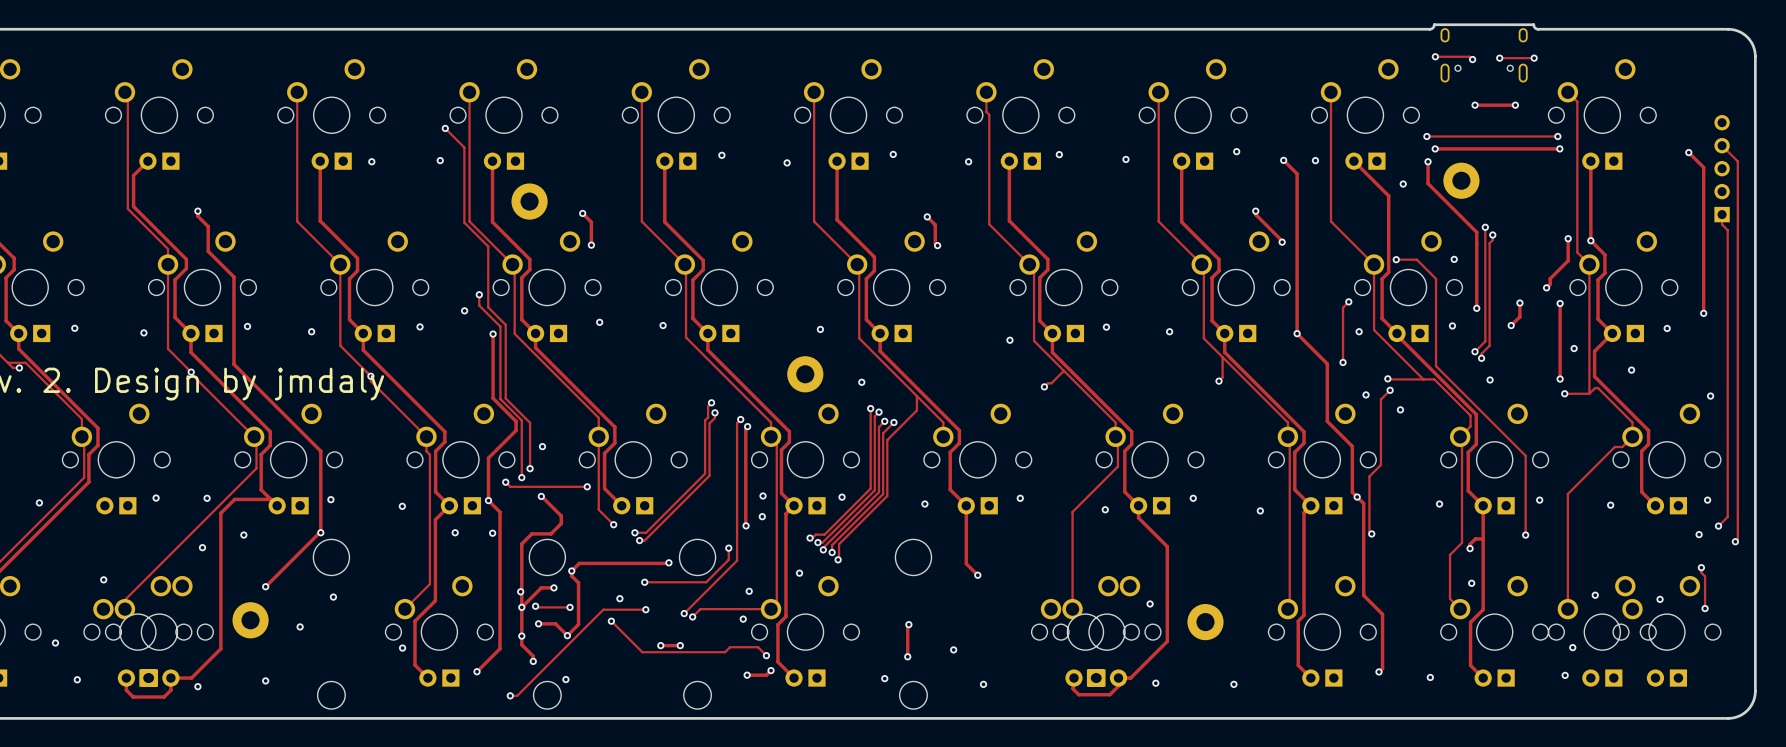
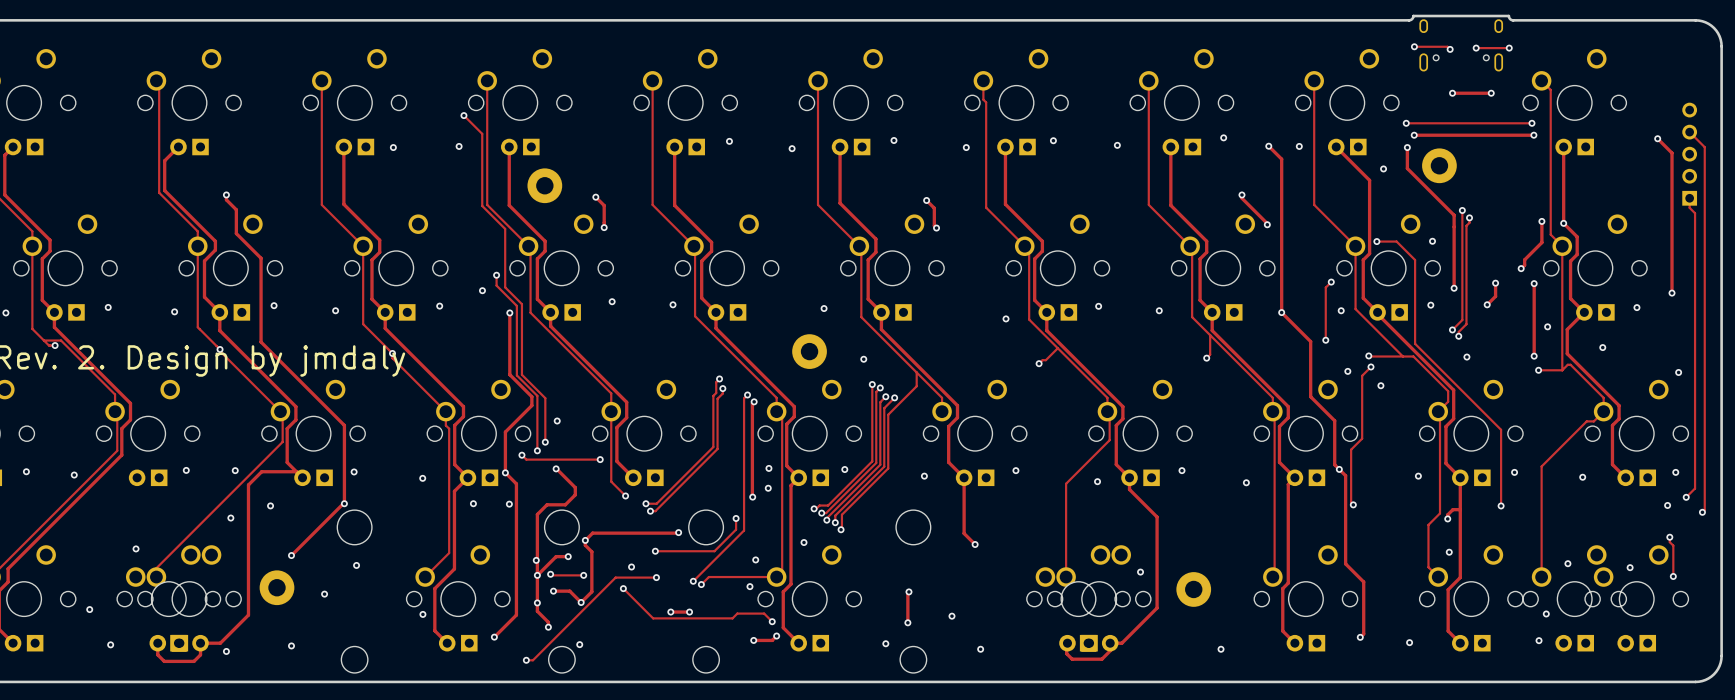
via: (1155, 683) -> none

